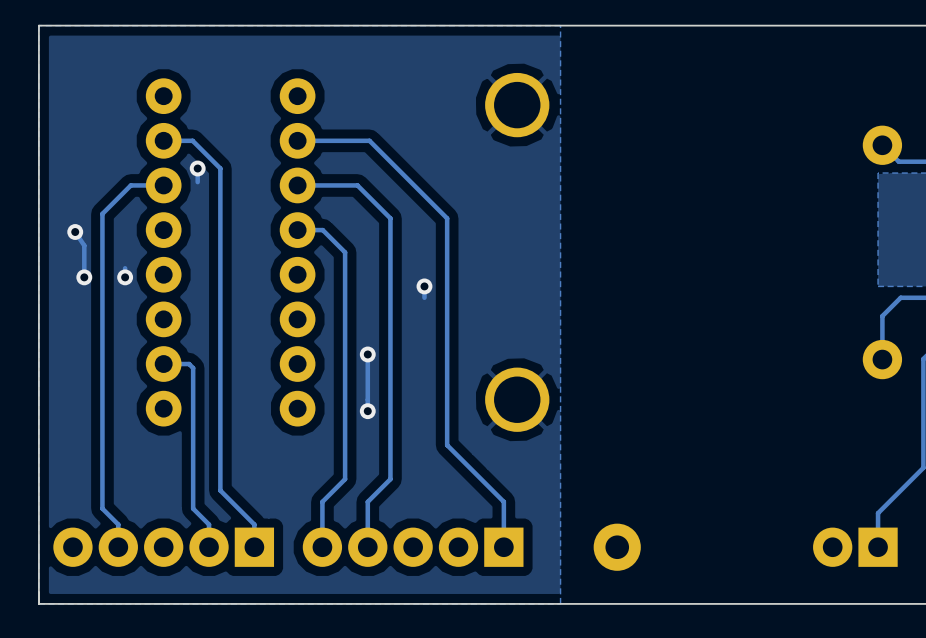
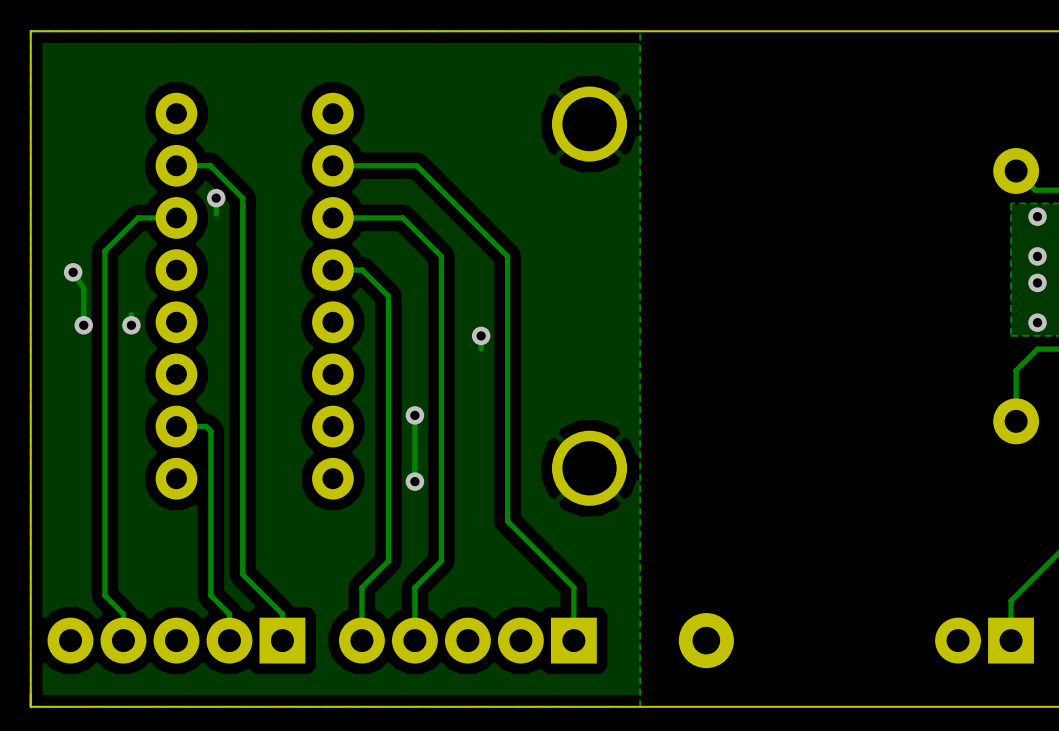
via: none -> (1037, 216)
via: none -> (1037, 256)
via: none -> (1037, 282)
via: none -> (1037, 322)

